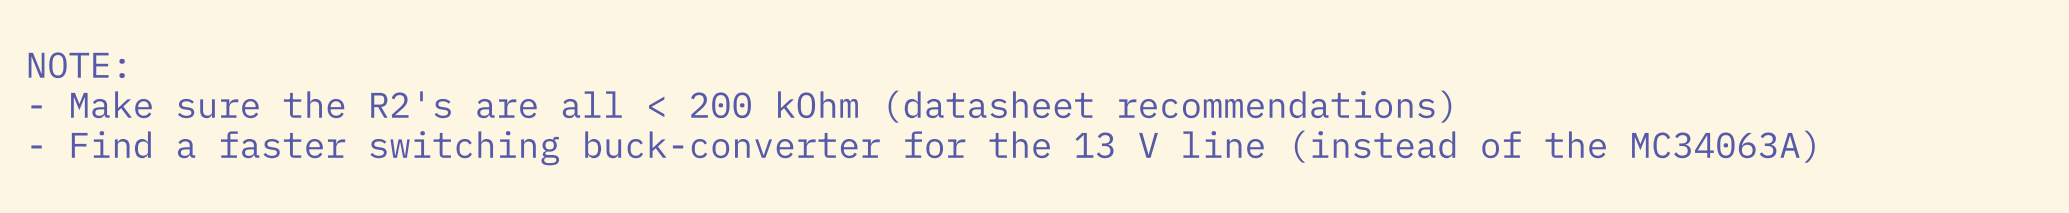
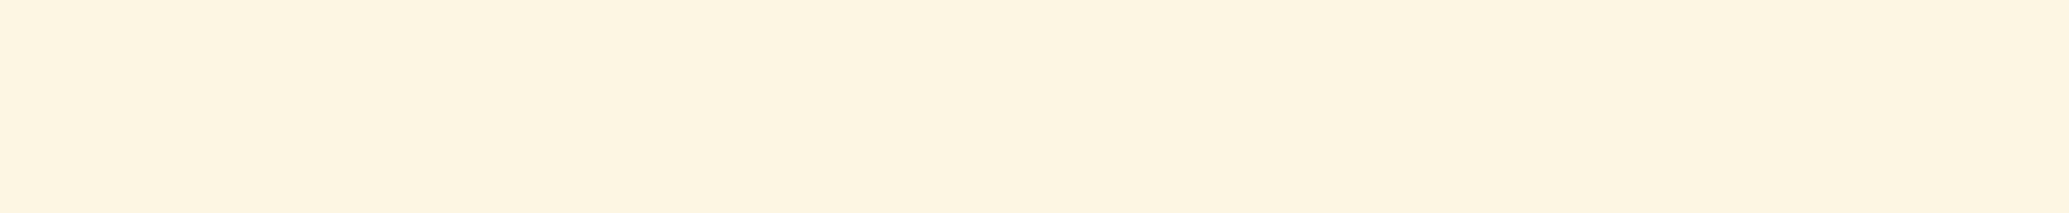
text: NOTE: (76, 65) -> none
text: - Make sure the R2's are all < 200 kOhm (datasheet recommendations) (741, 106) -> none
text: - Find a faster switching buck-converter for the 13 V line (instead of the MC34063A) (923, 148) -> none

